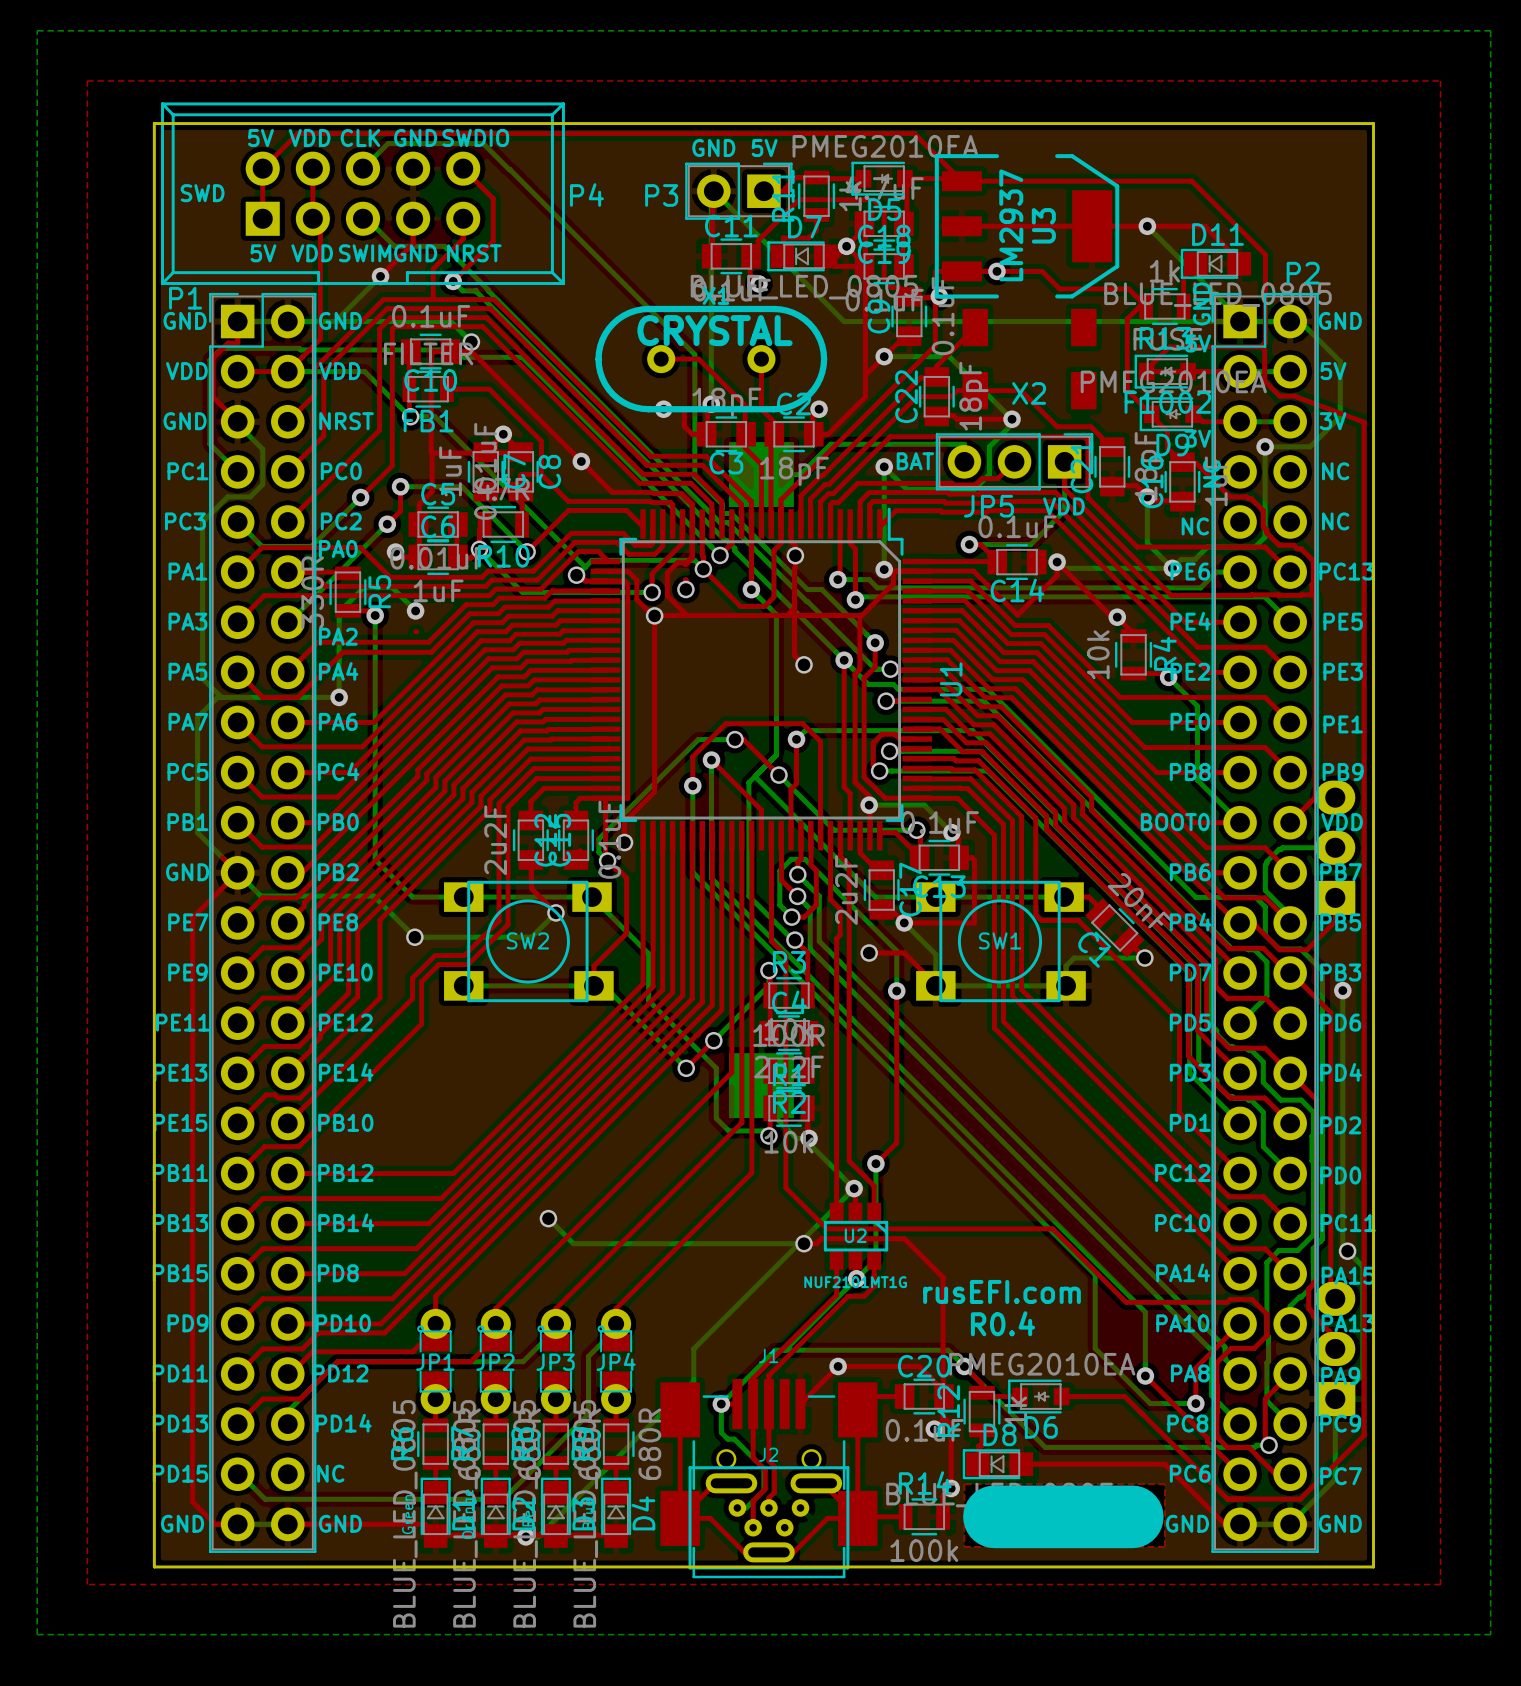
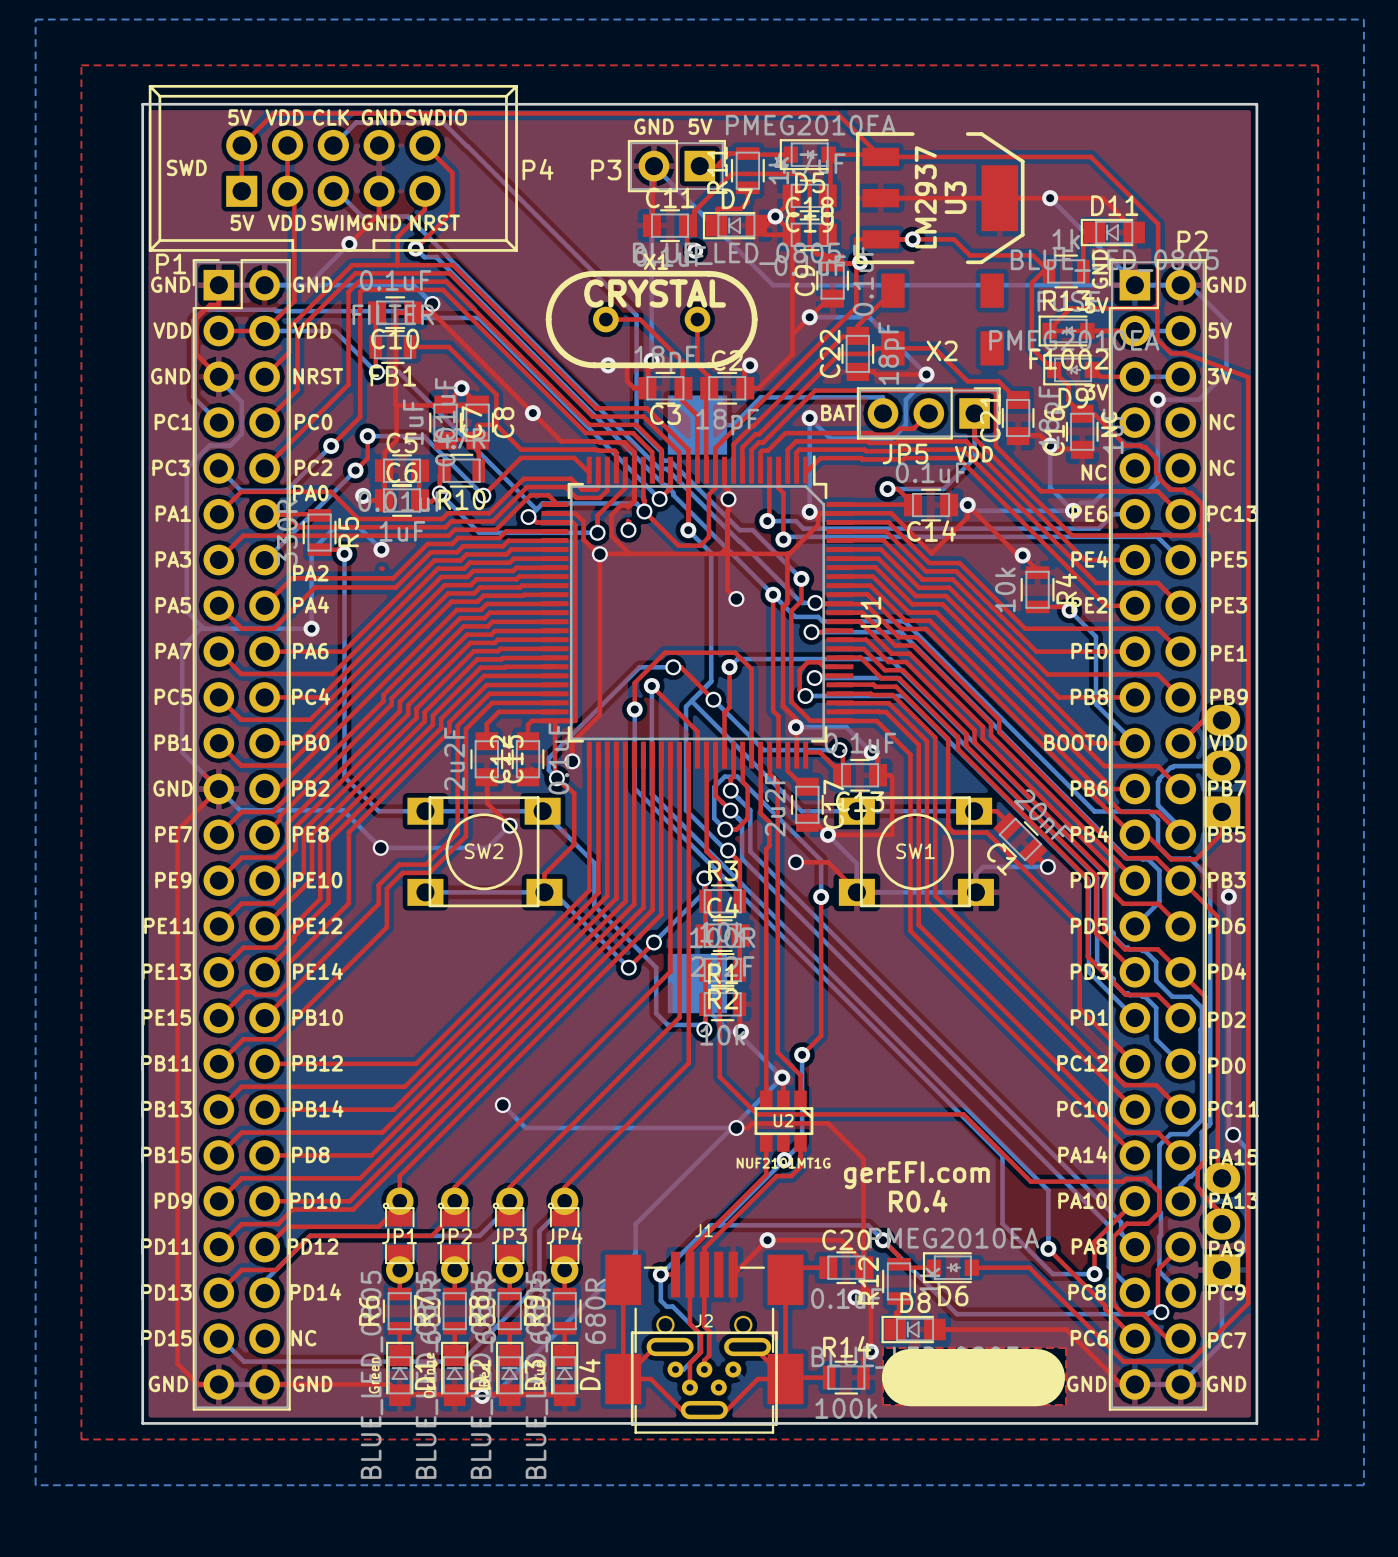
text: rusEFI.com (1002, 1291) -> gerEFI.com (916, 1175)

